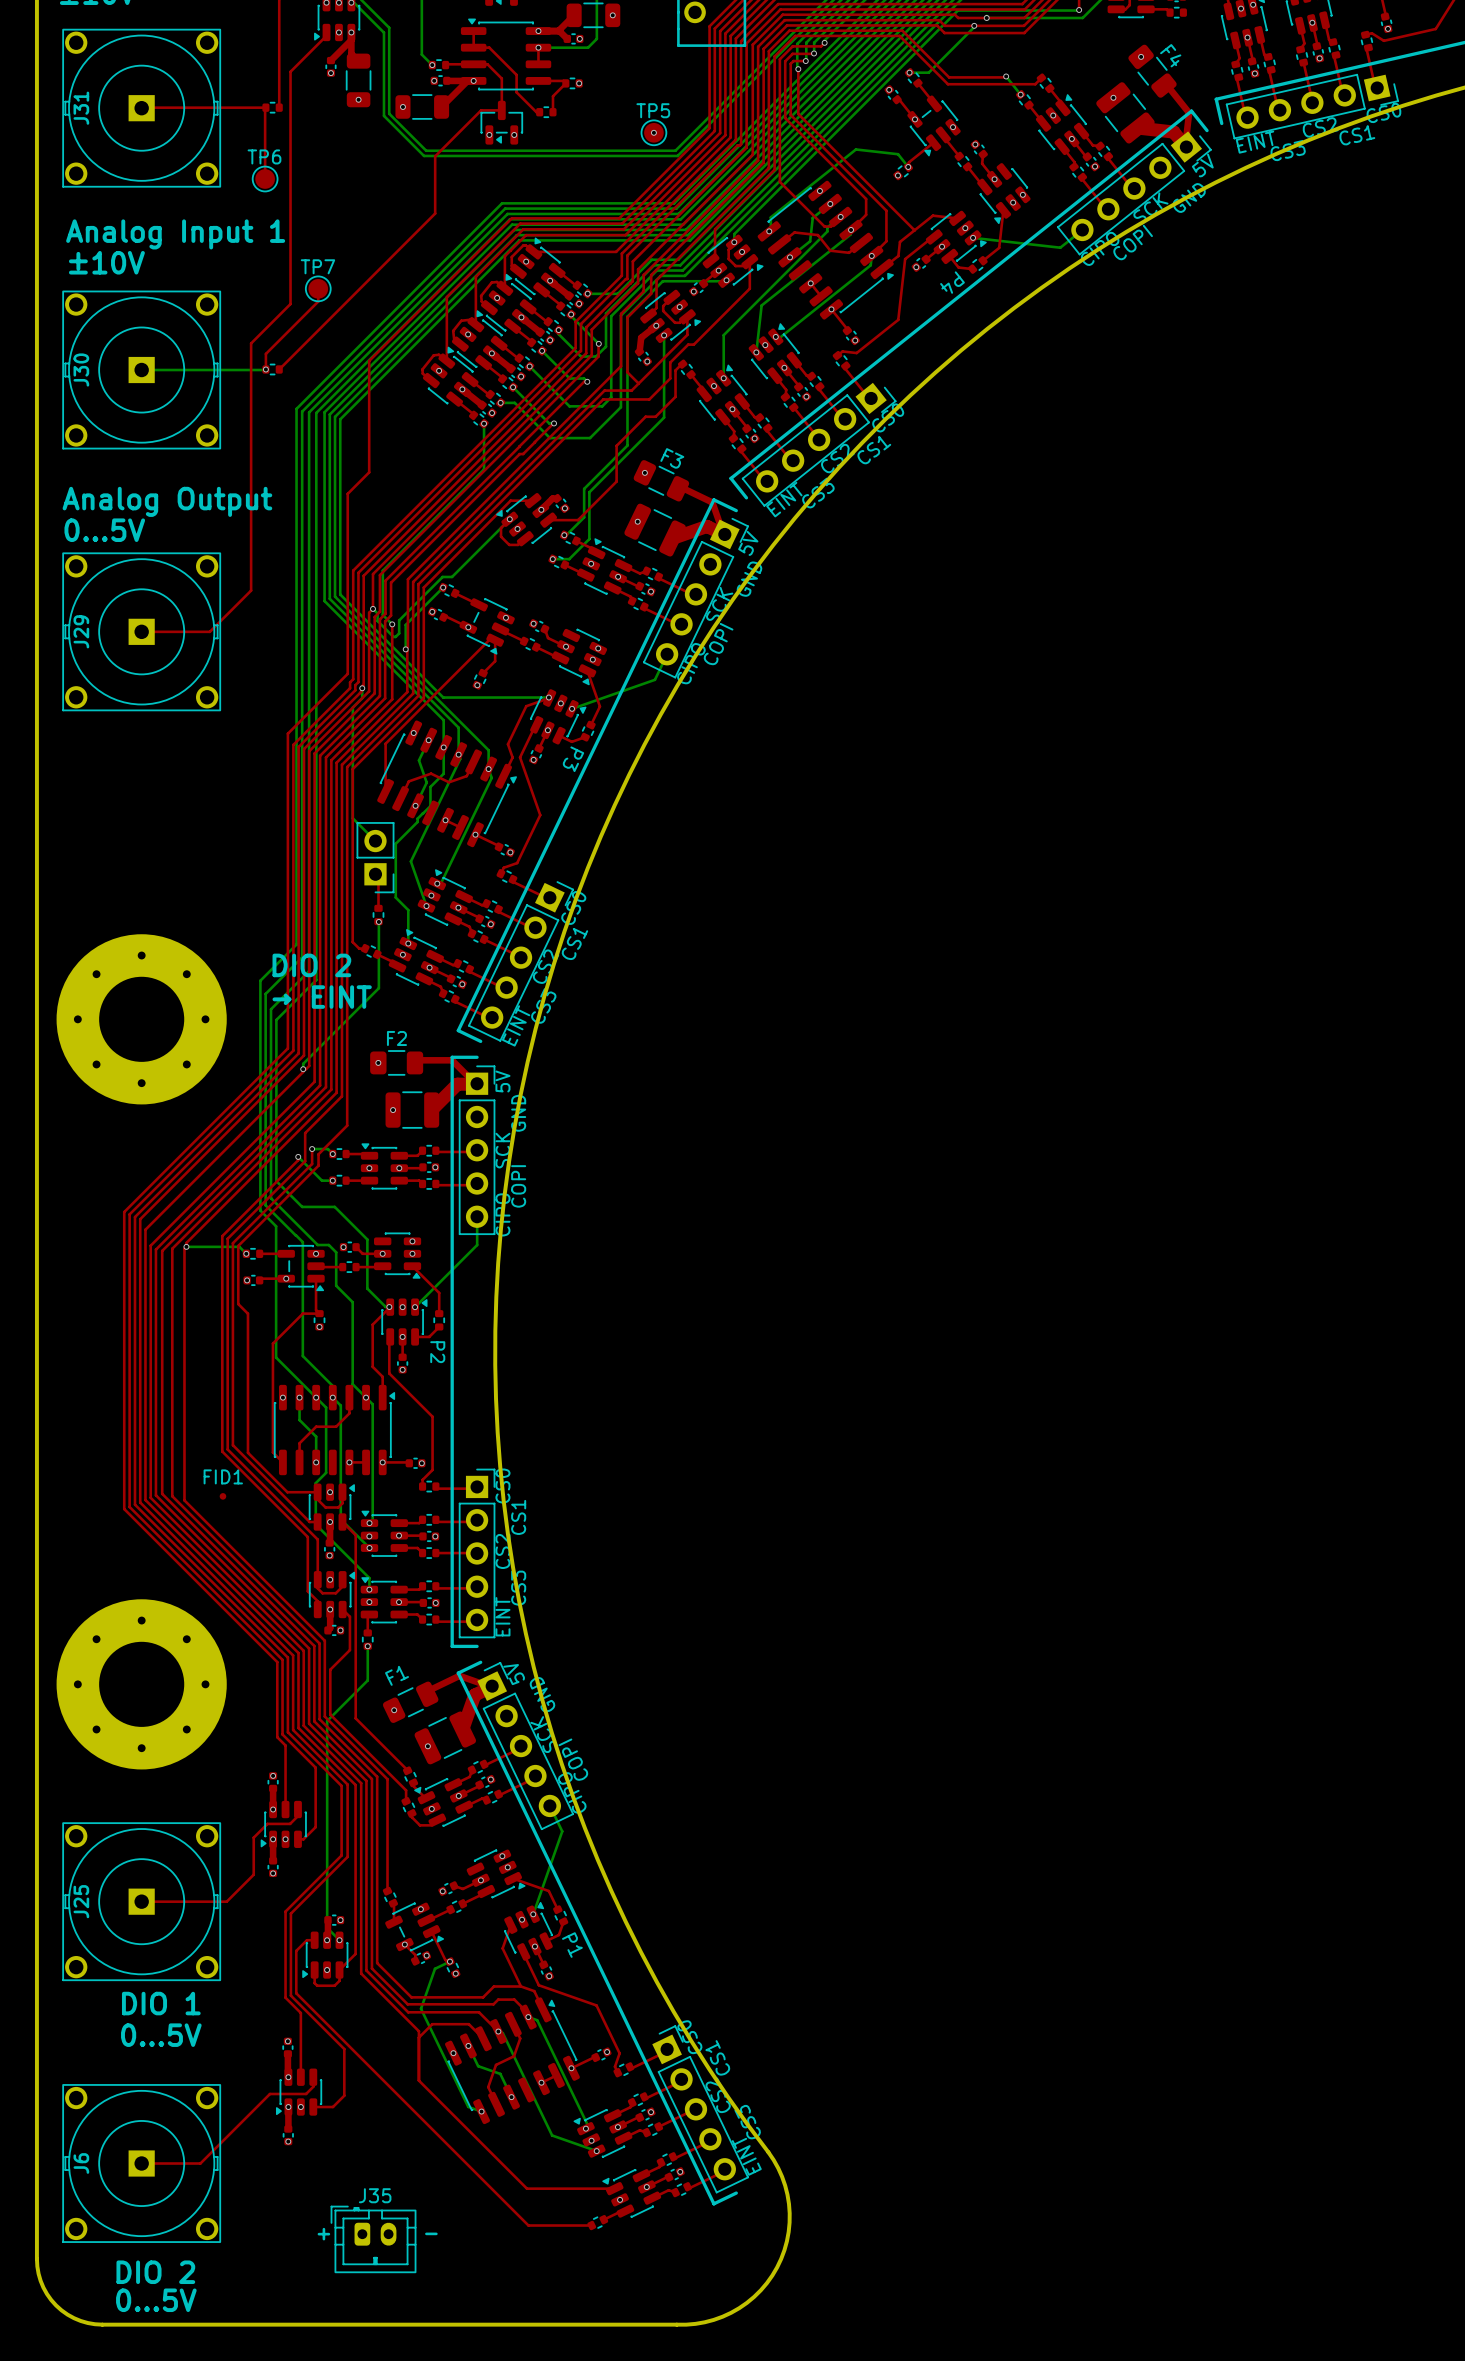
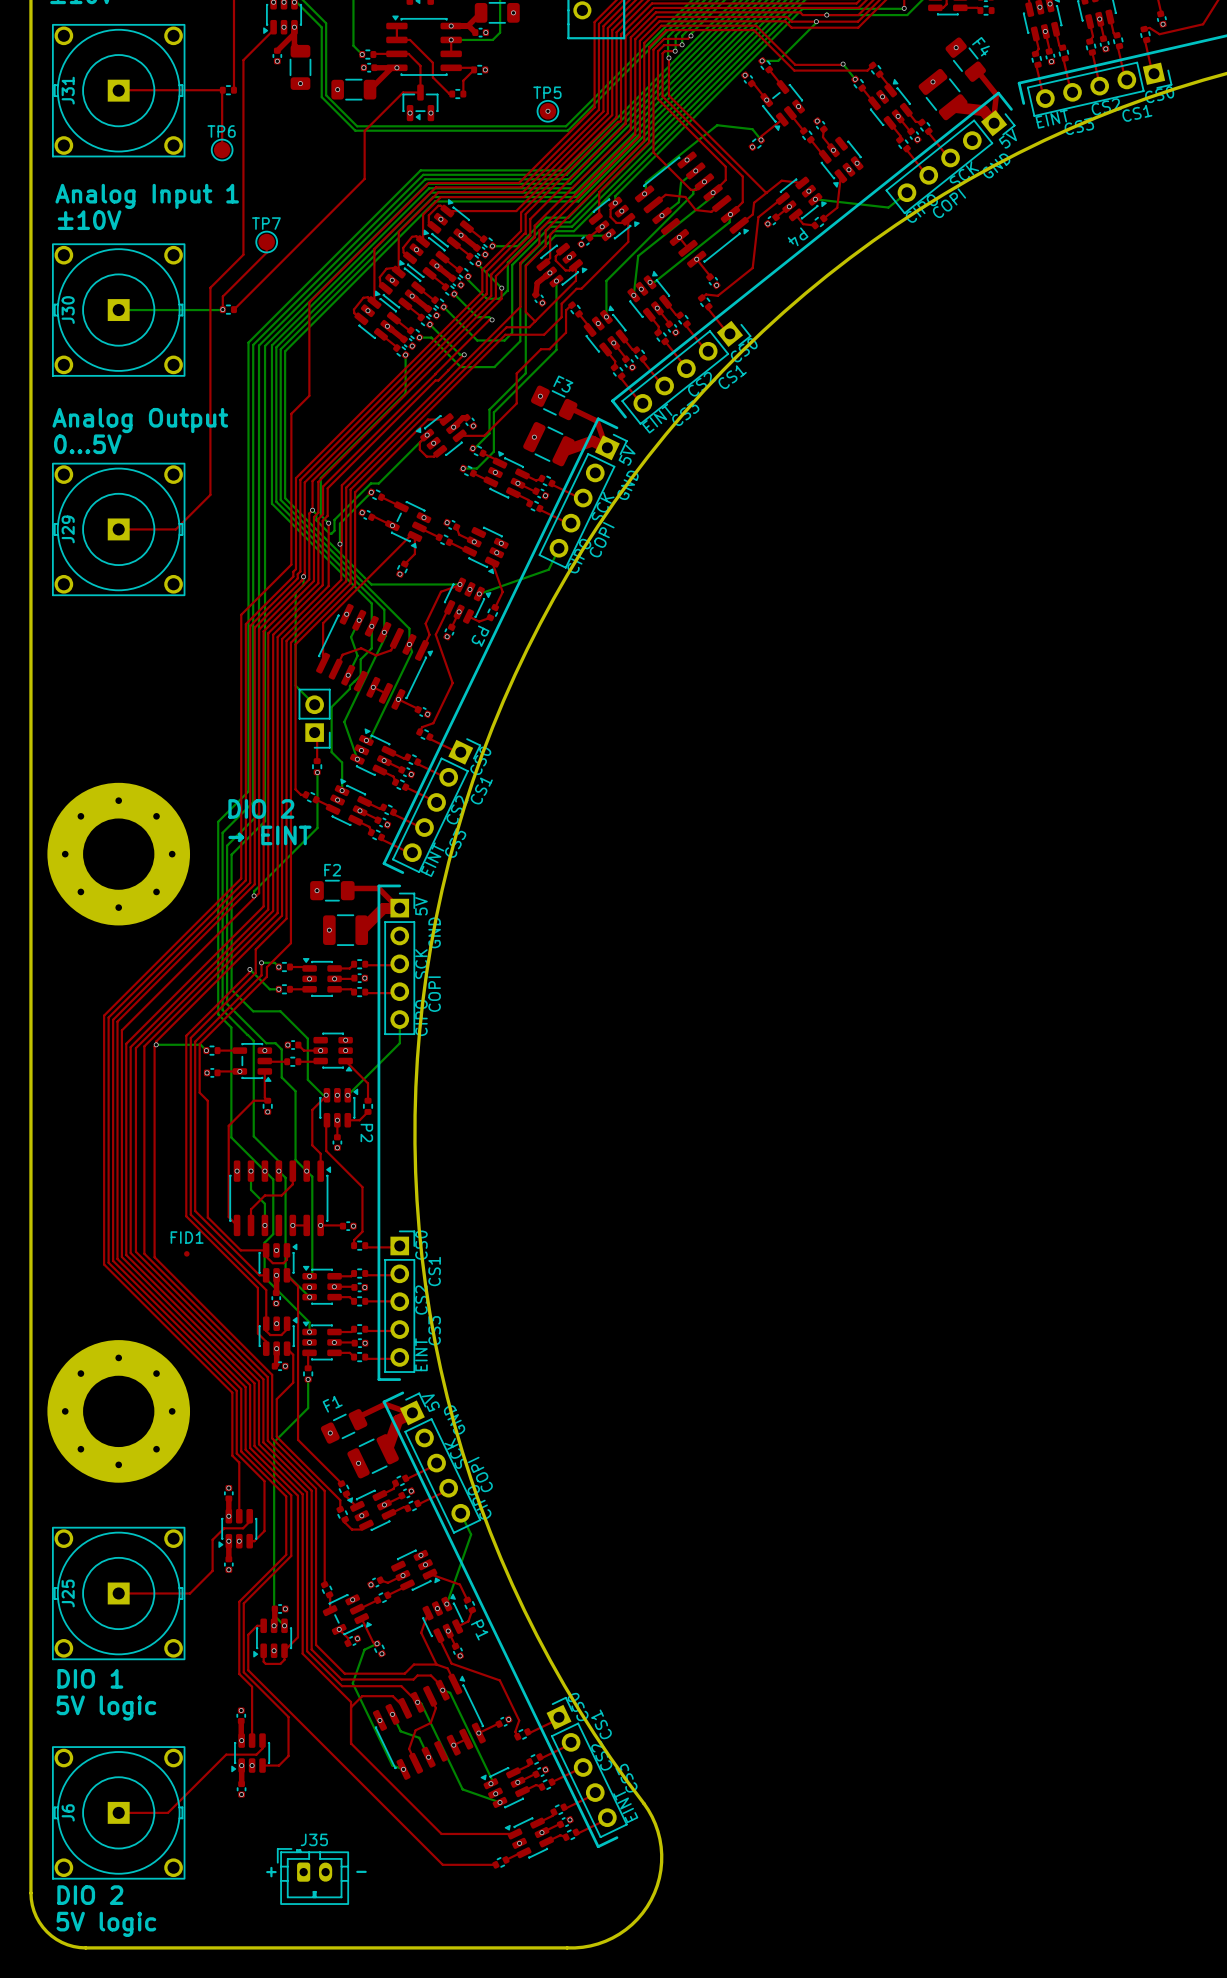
text position: DIO 1 (161, 2003) -> DIO 1 (90, 1678)
text: 0…5V (161, 2035) -> none
text: none -> 5V logic (106, 1708)
text position: DIO 2 (155, 2272) -> DIO 2 (90, 1895)
text: none -> 5V logic (106, 1924)
text: 0…5V (156, 2300) -> none

